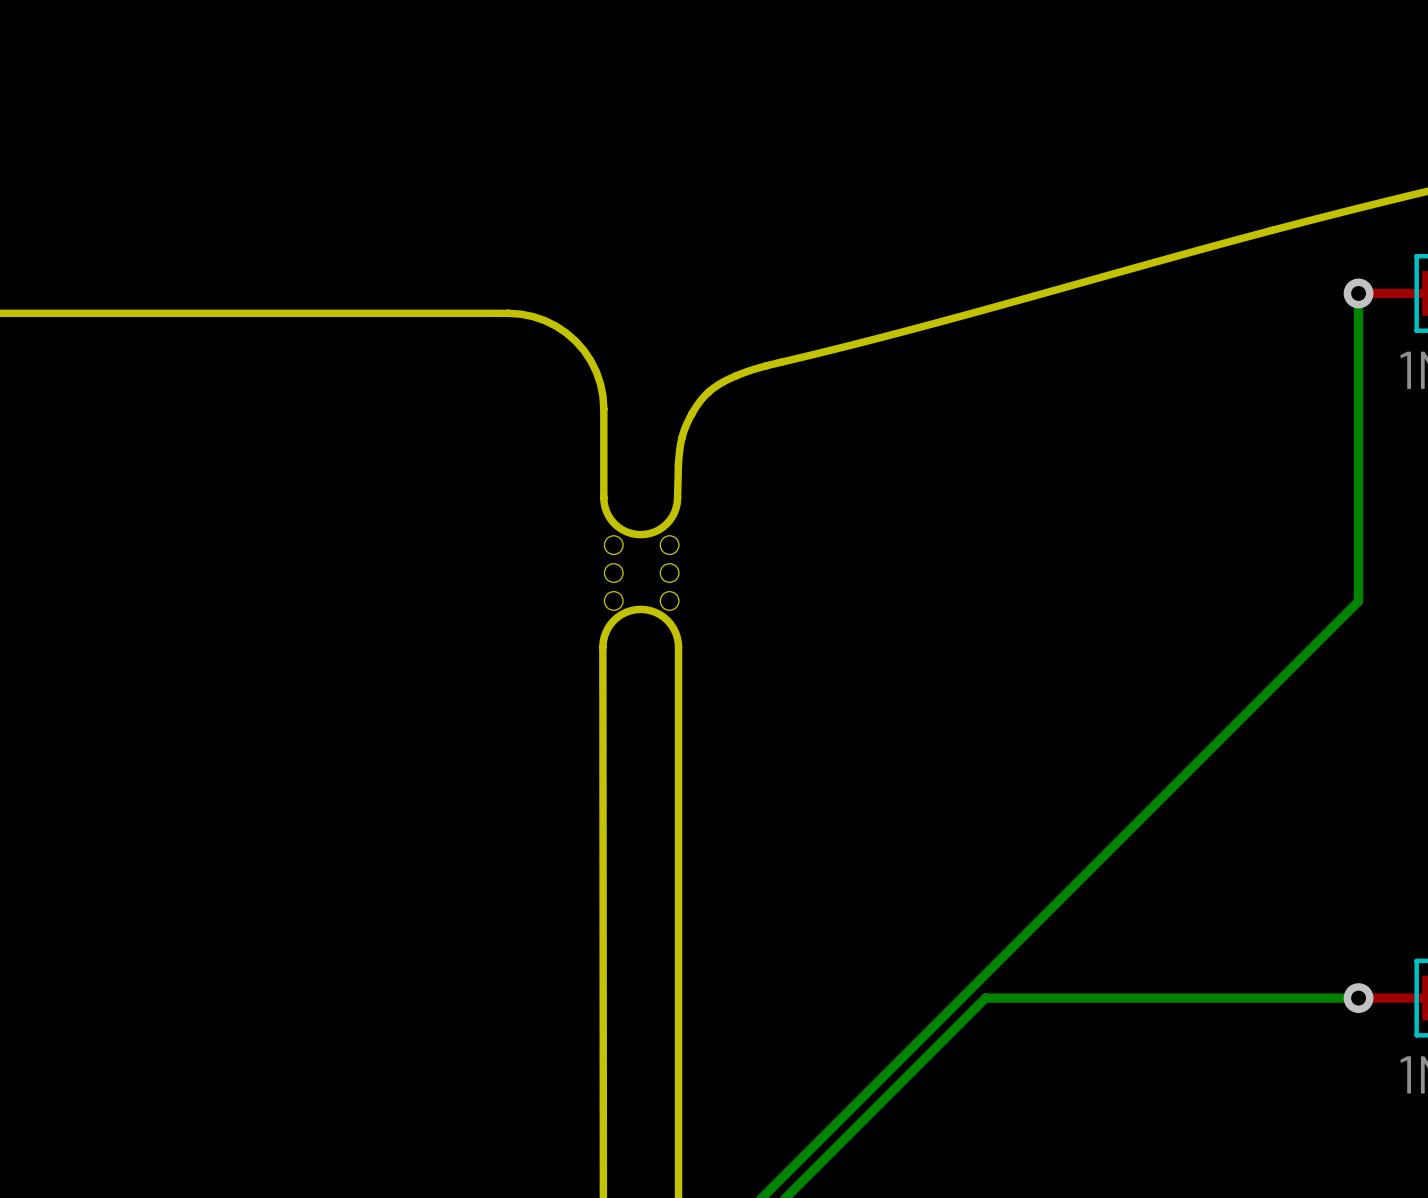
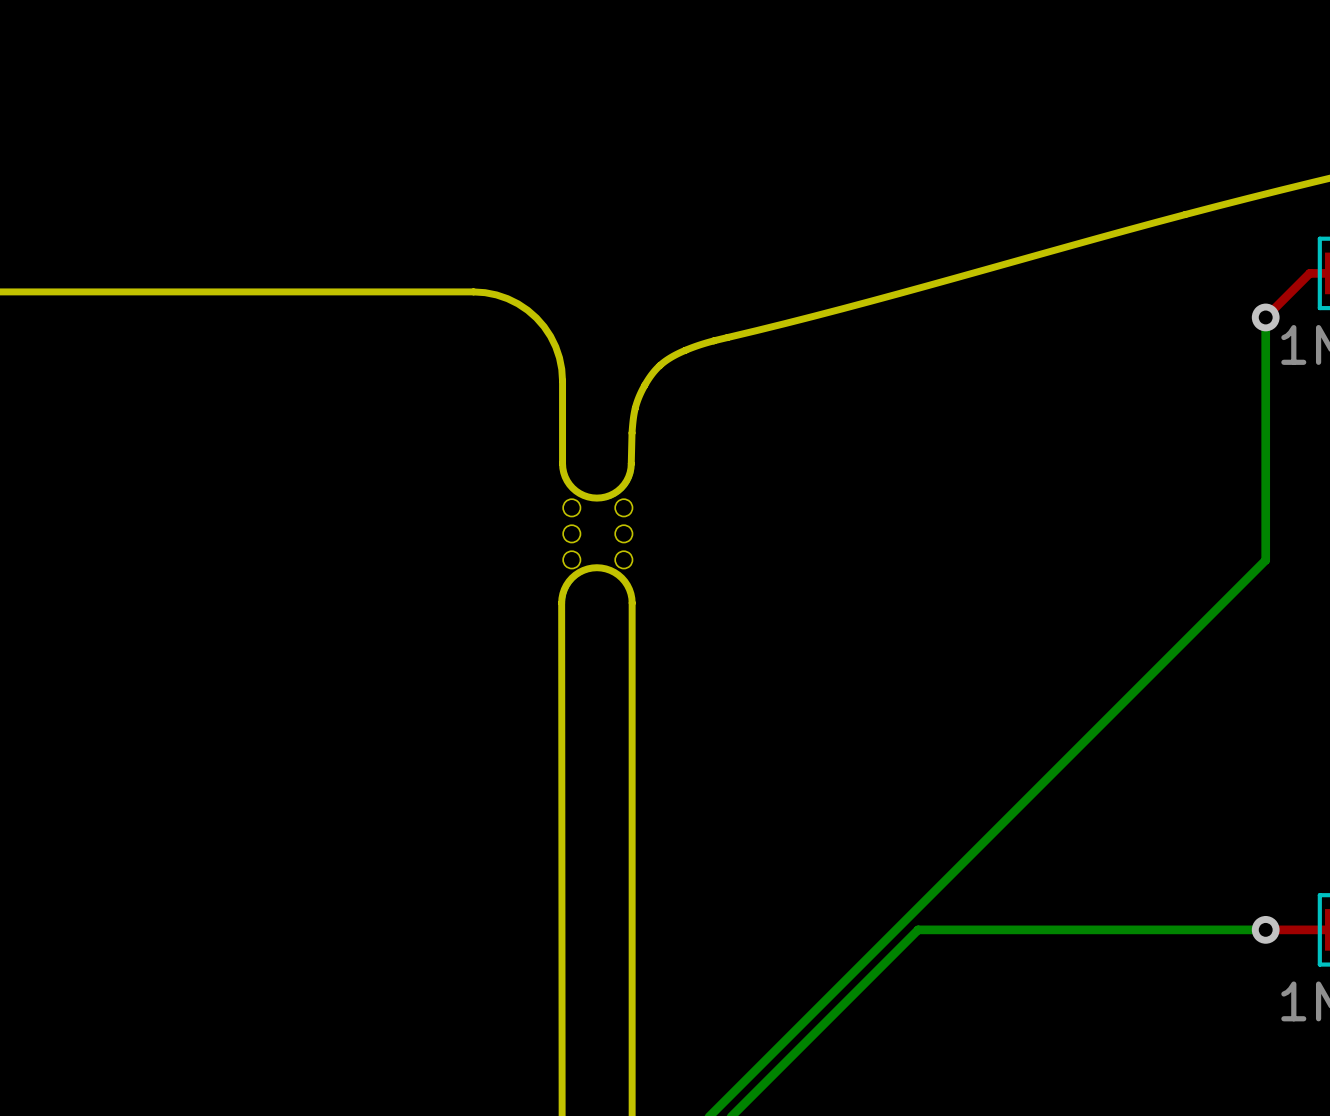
bottom track: (1358, 293) (1358, 340) -> none
top track: (1358, 293) (1405, 293) -> (1265, 317) (1309, 273)
via position: (1358, 293) -> (1265, 317)

